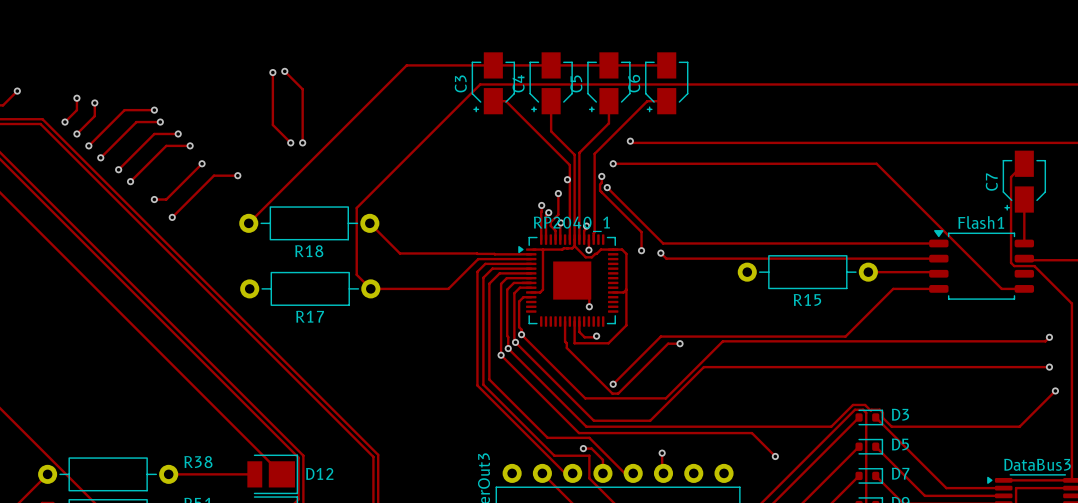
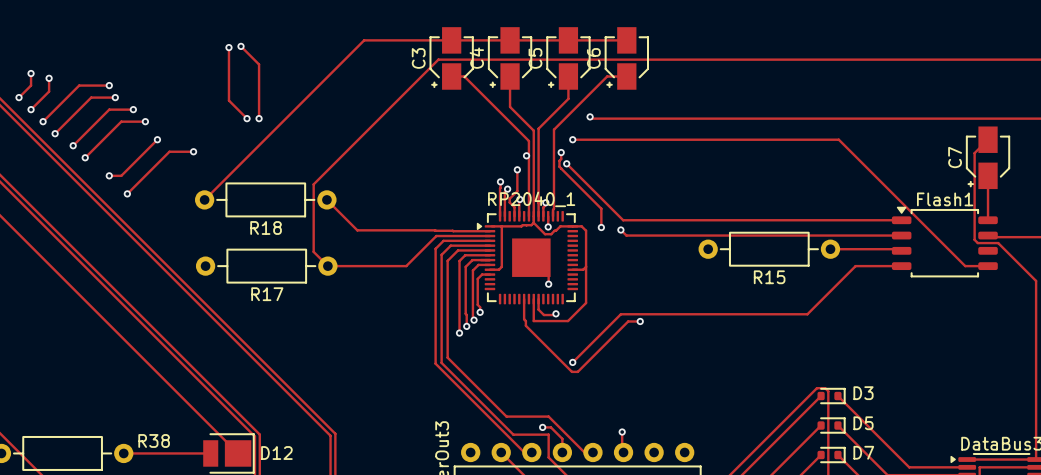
track: (521, 334) (585, 398) (665, 398) (722, 341) (1045, 341) (1049, 337) -> none
via: (1049, 337) -> none
track: (515, 342) (593, 420) (650, 420) (703, 367) (1049, 367) -> none
track: (508, 348) (586, 426) (831, 426) (853, 404) (865, 404) (870, 410) (879, 409) (882, 412) (882, 417) (891, 426) (1019, 426) (1055, 390) -> none
track: (501, 355) (578, 433) (751, 433) (775, 456) -> none
via: (1049, 367) -> none
via: (1055, 390) -> none
via: (775, 456) -> none

